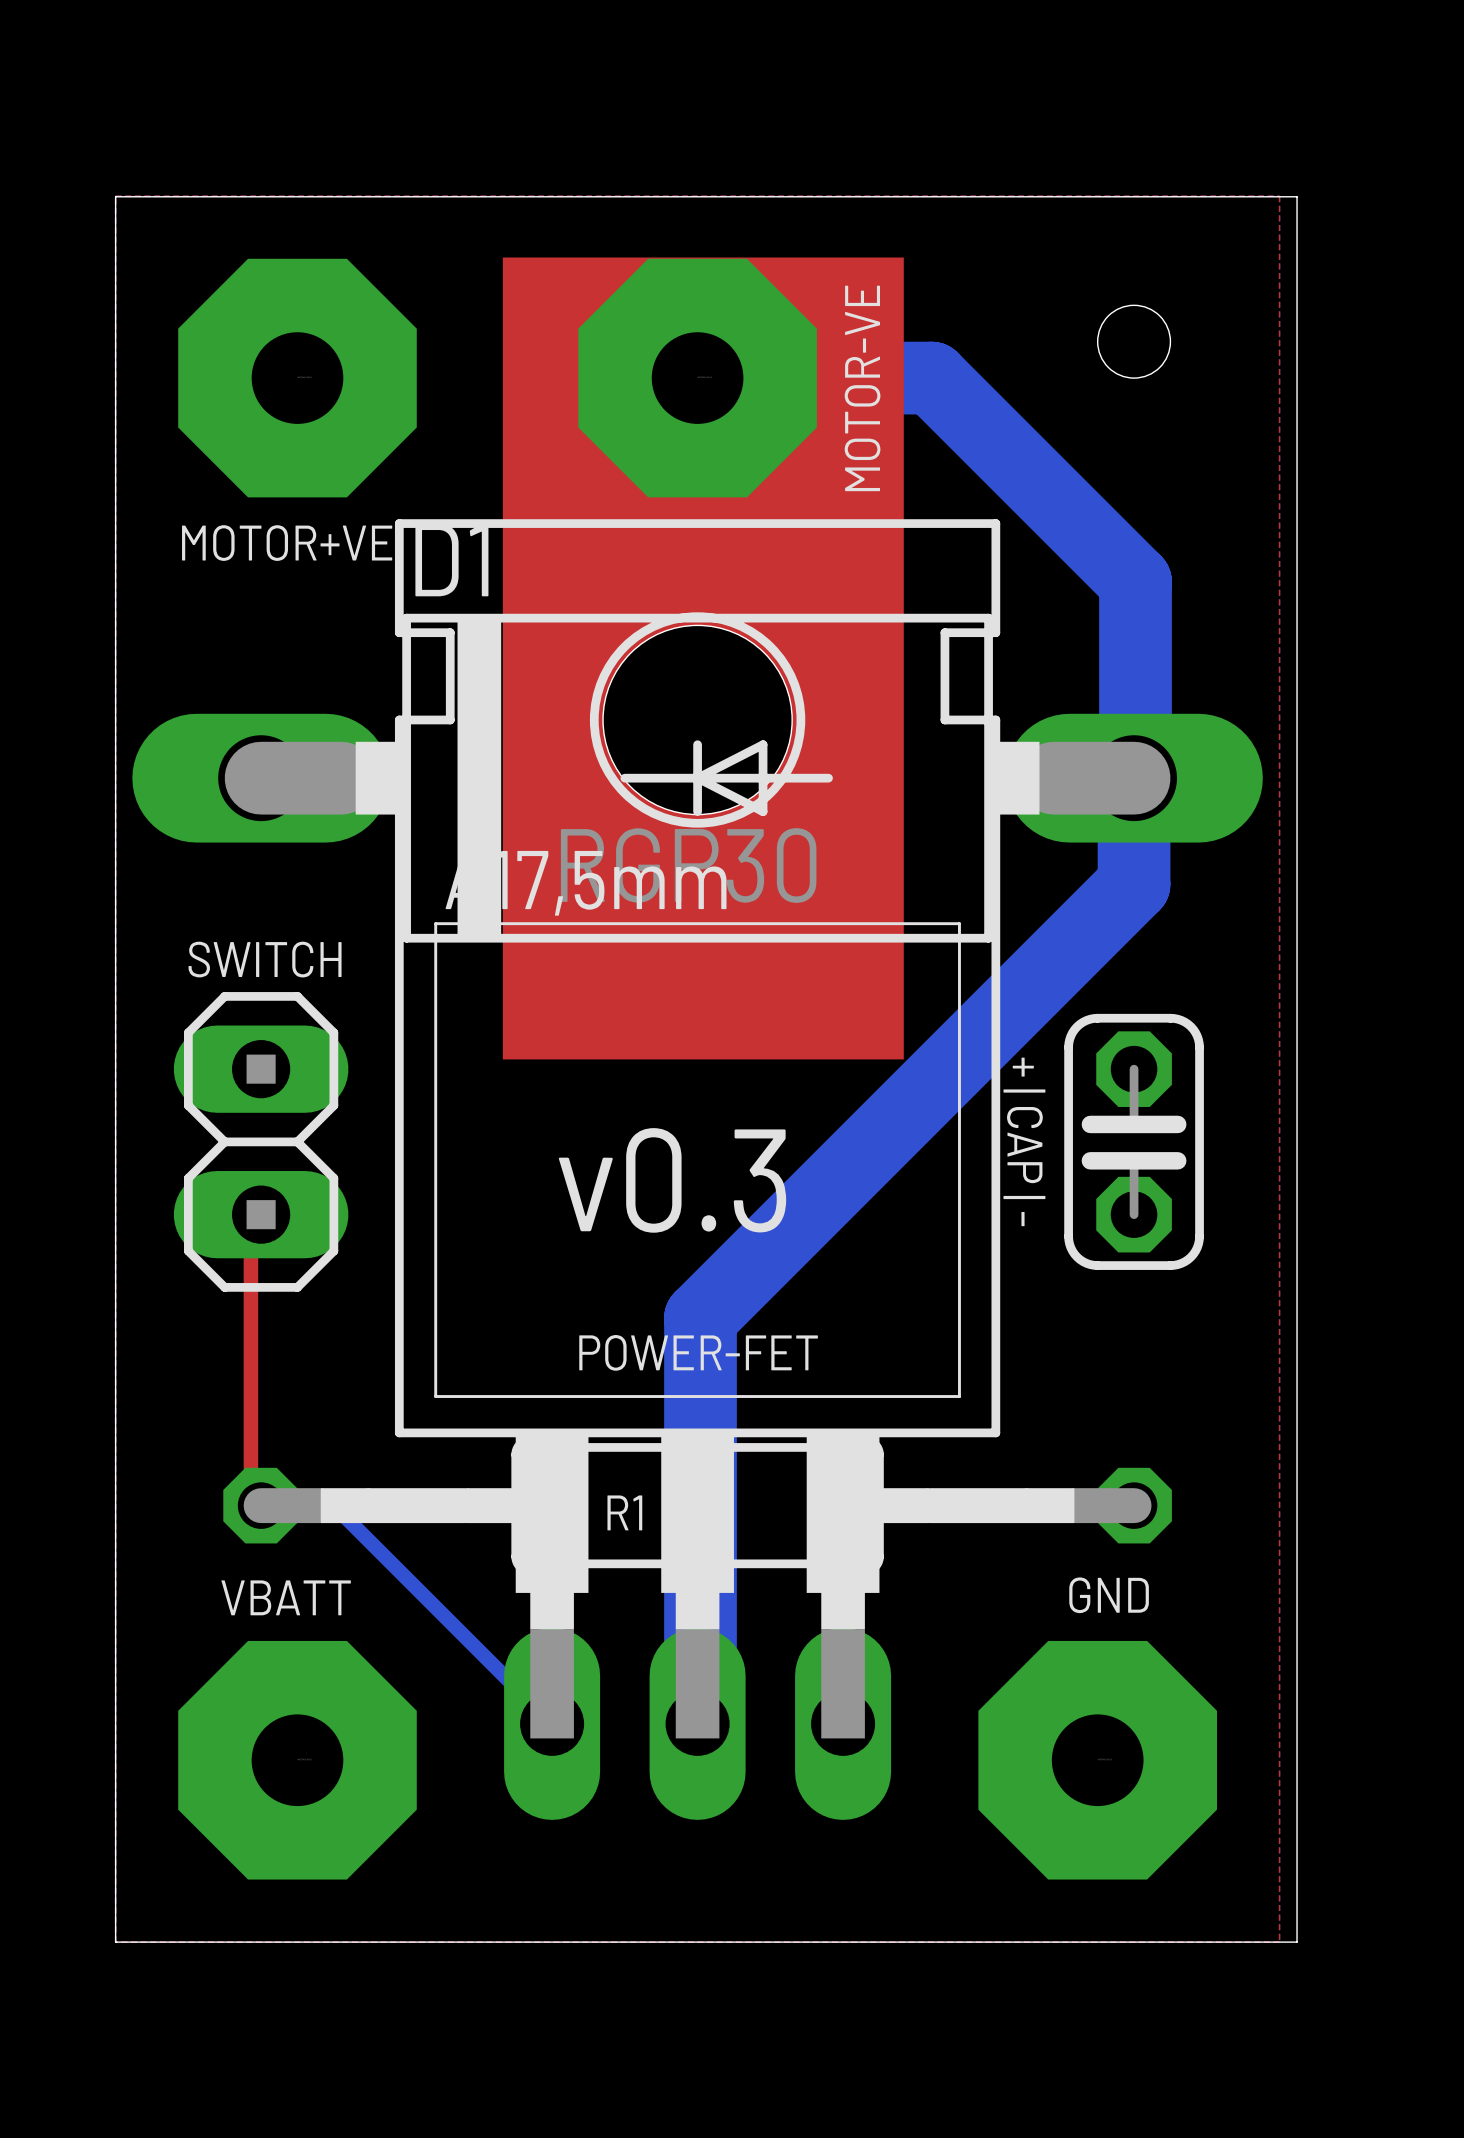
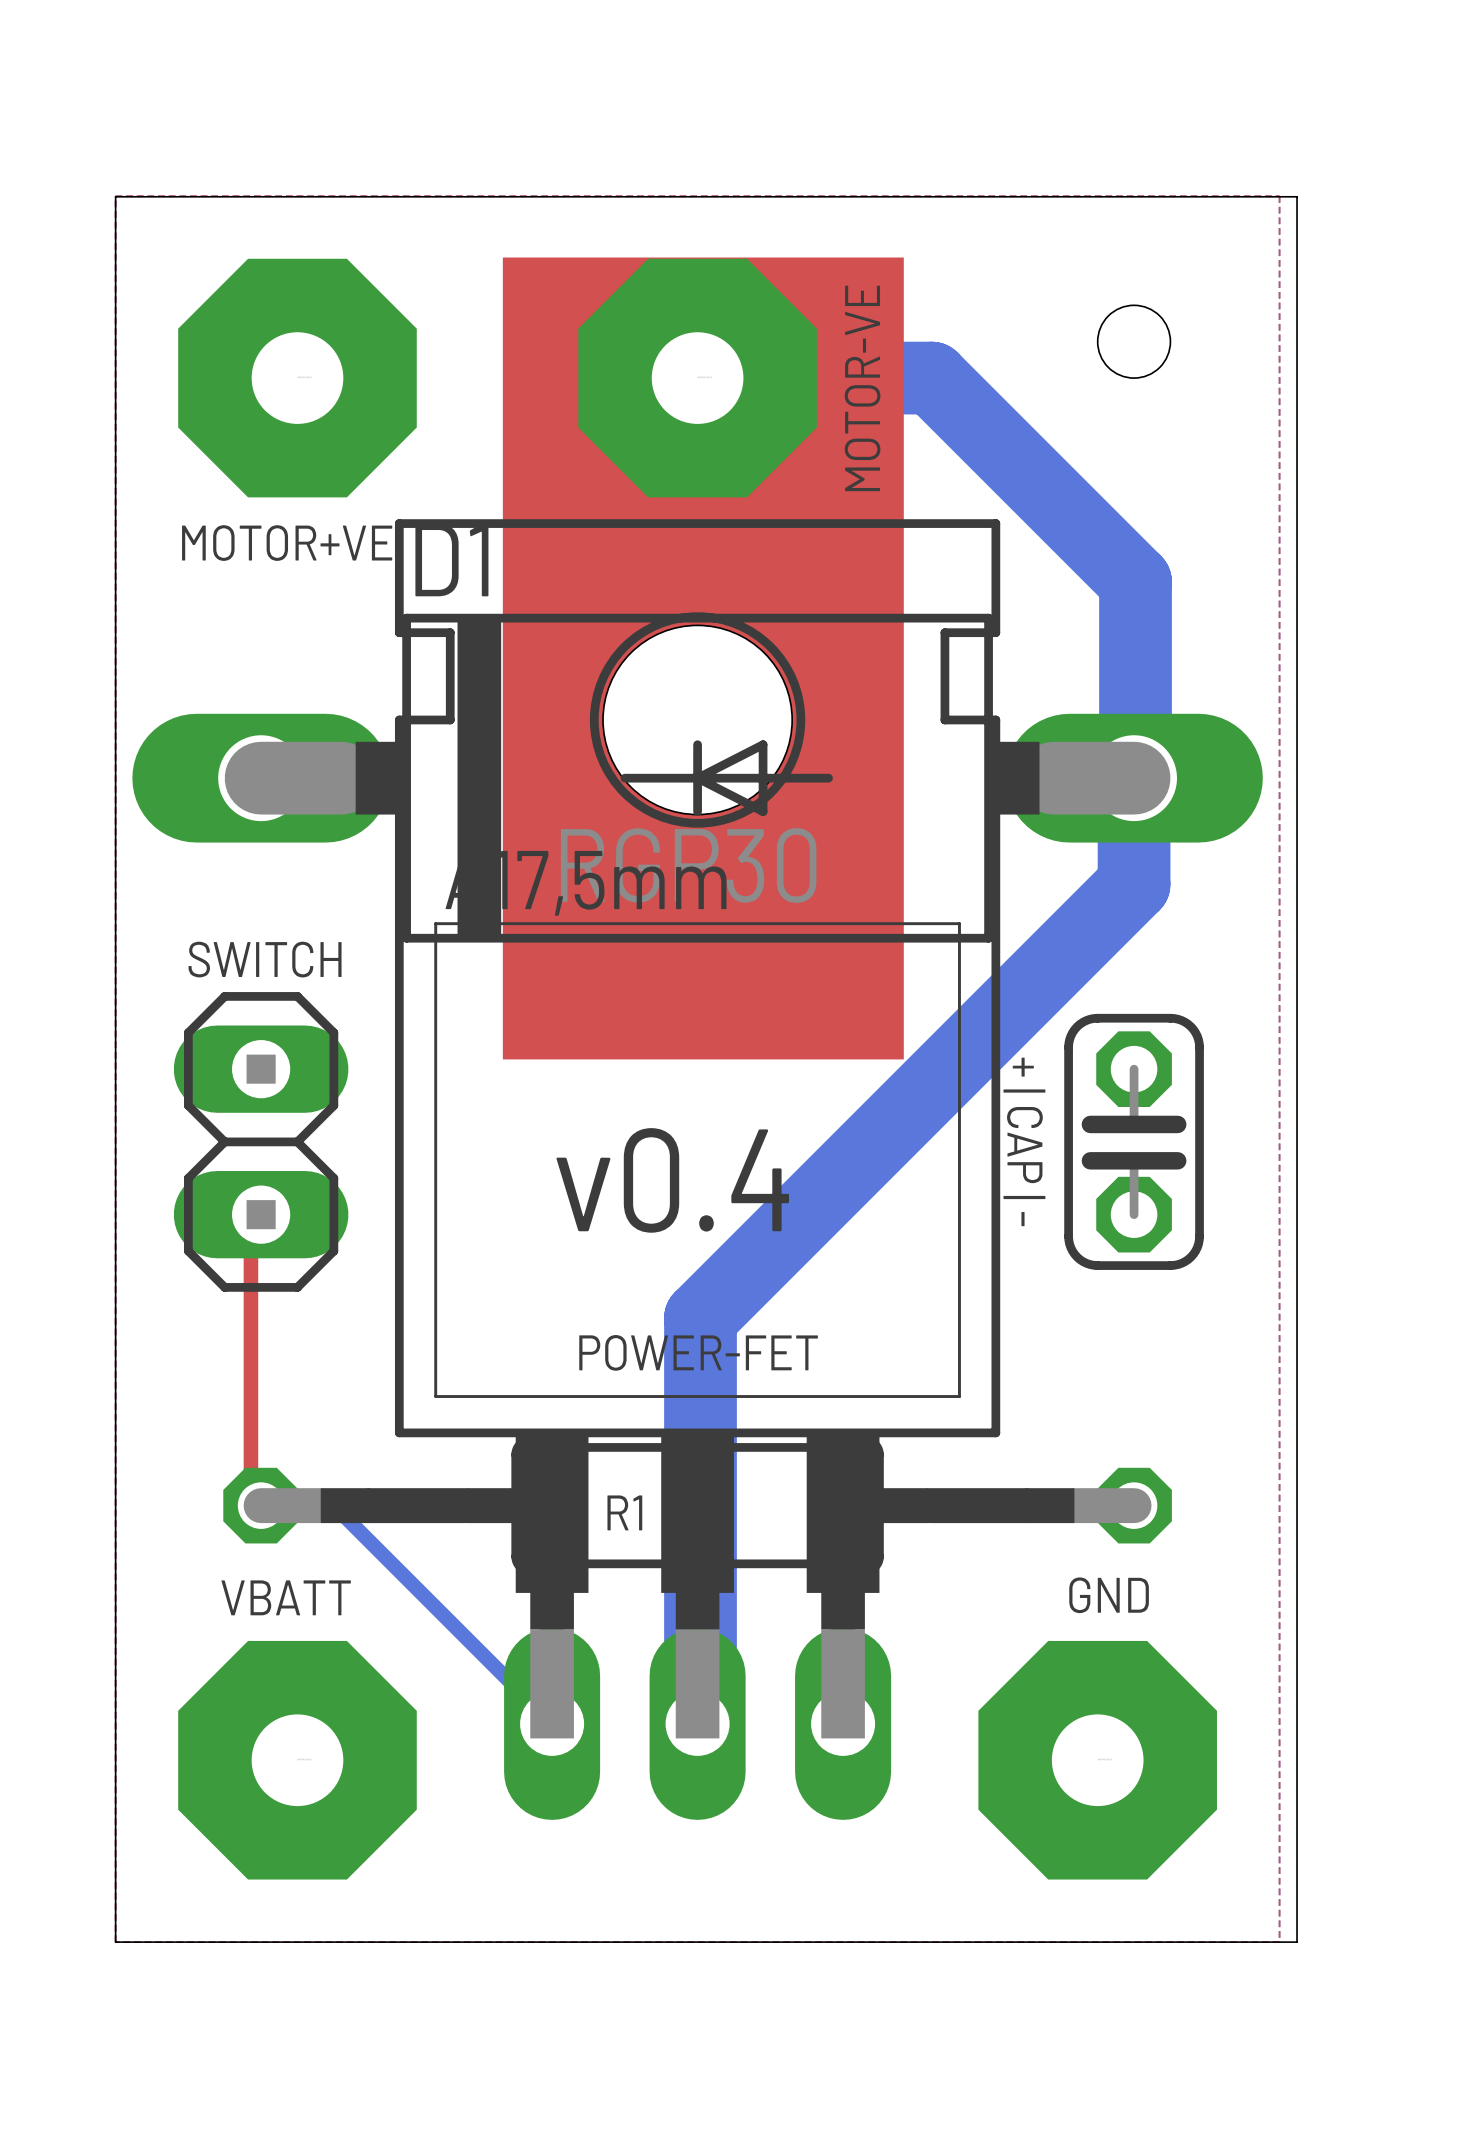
text: v0.3 (672, 1180) -> v0.4 (672, 1180)

